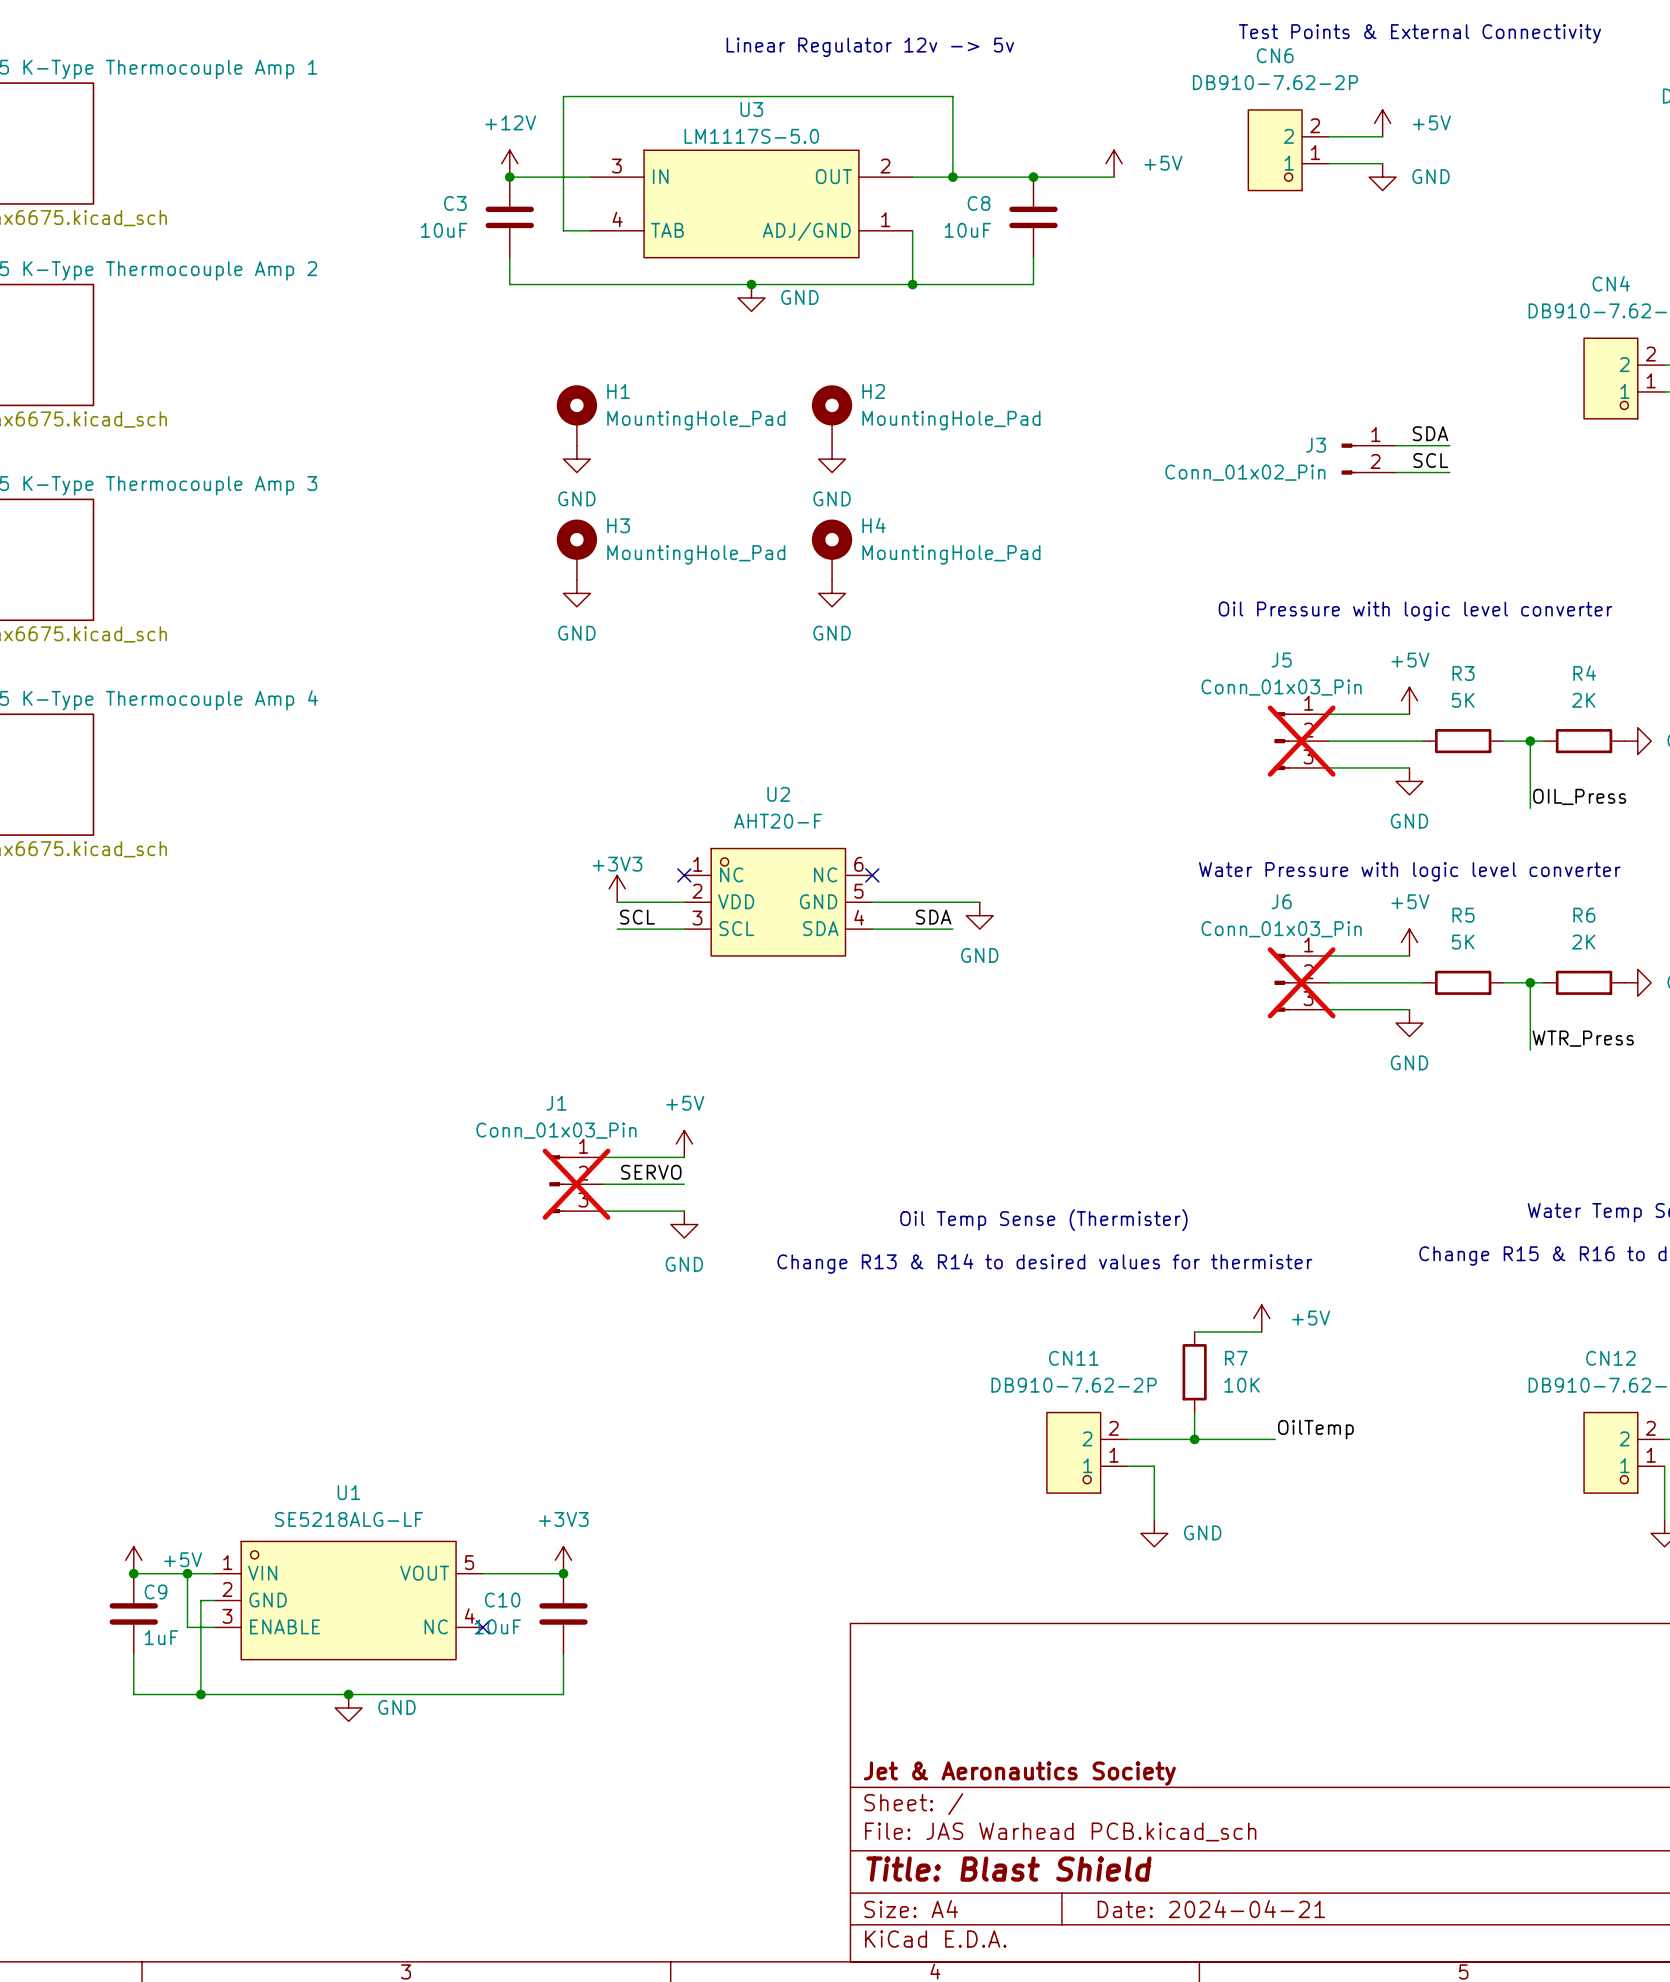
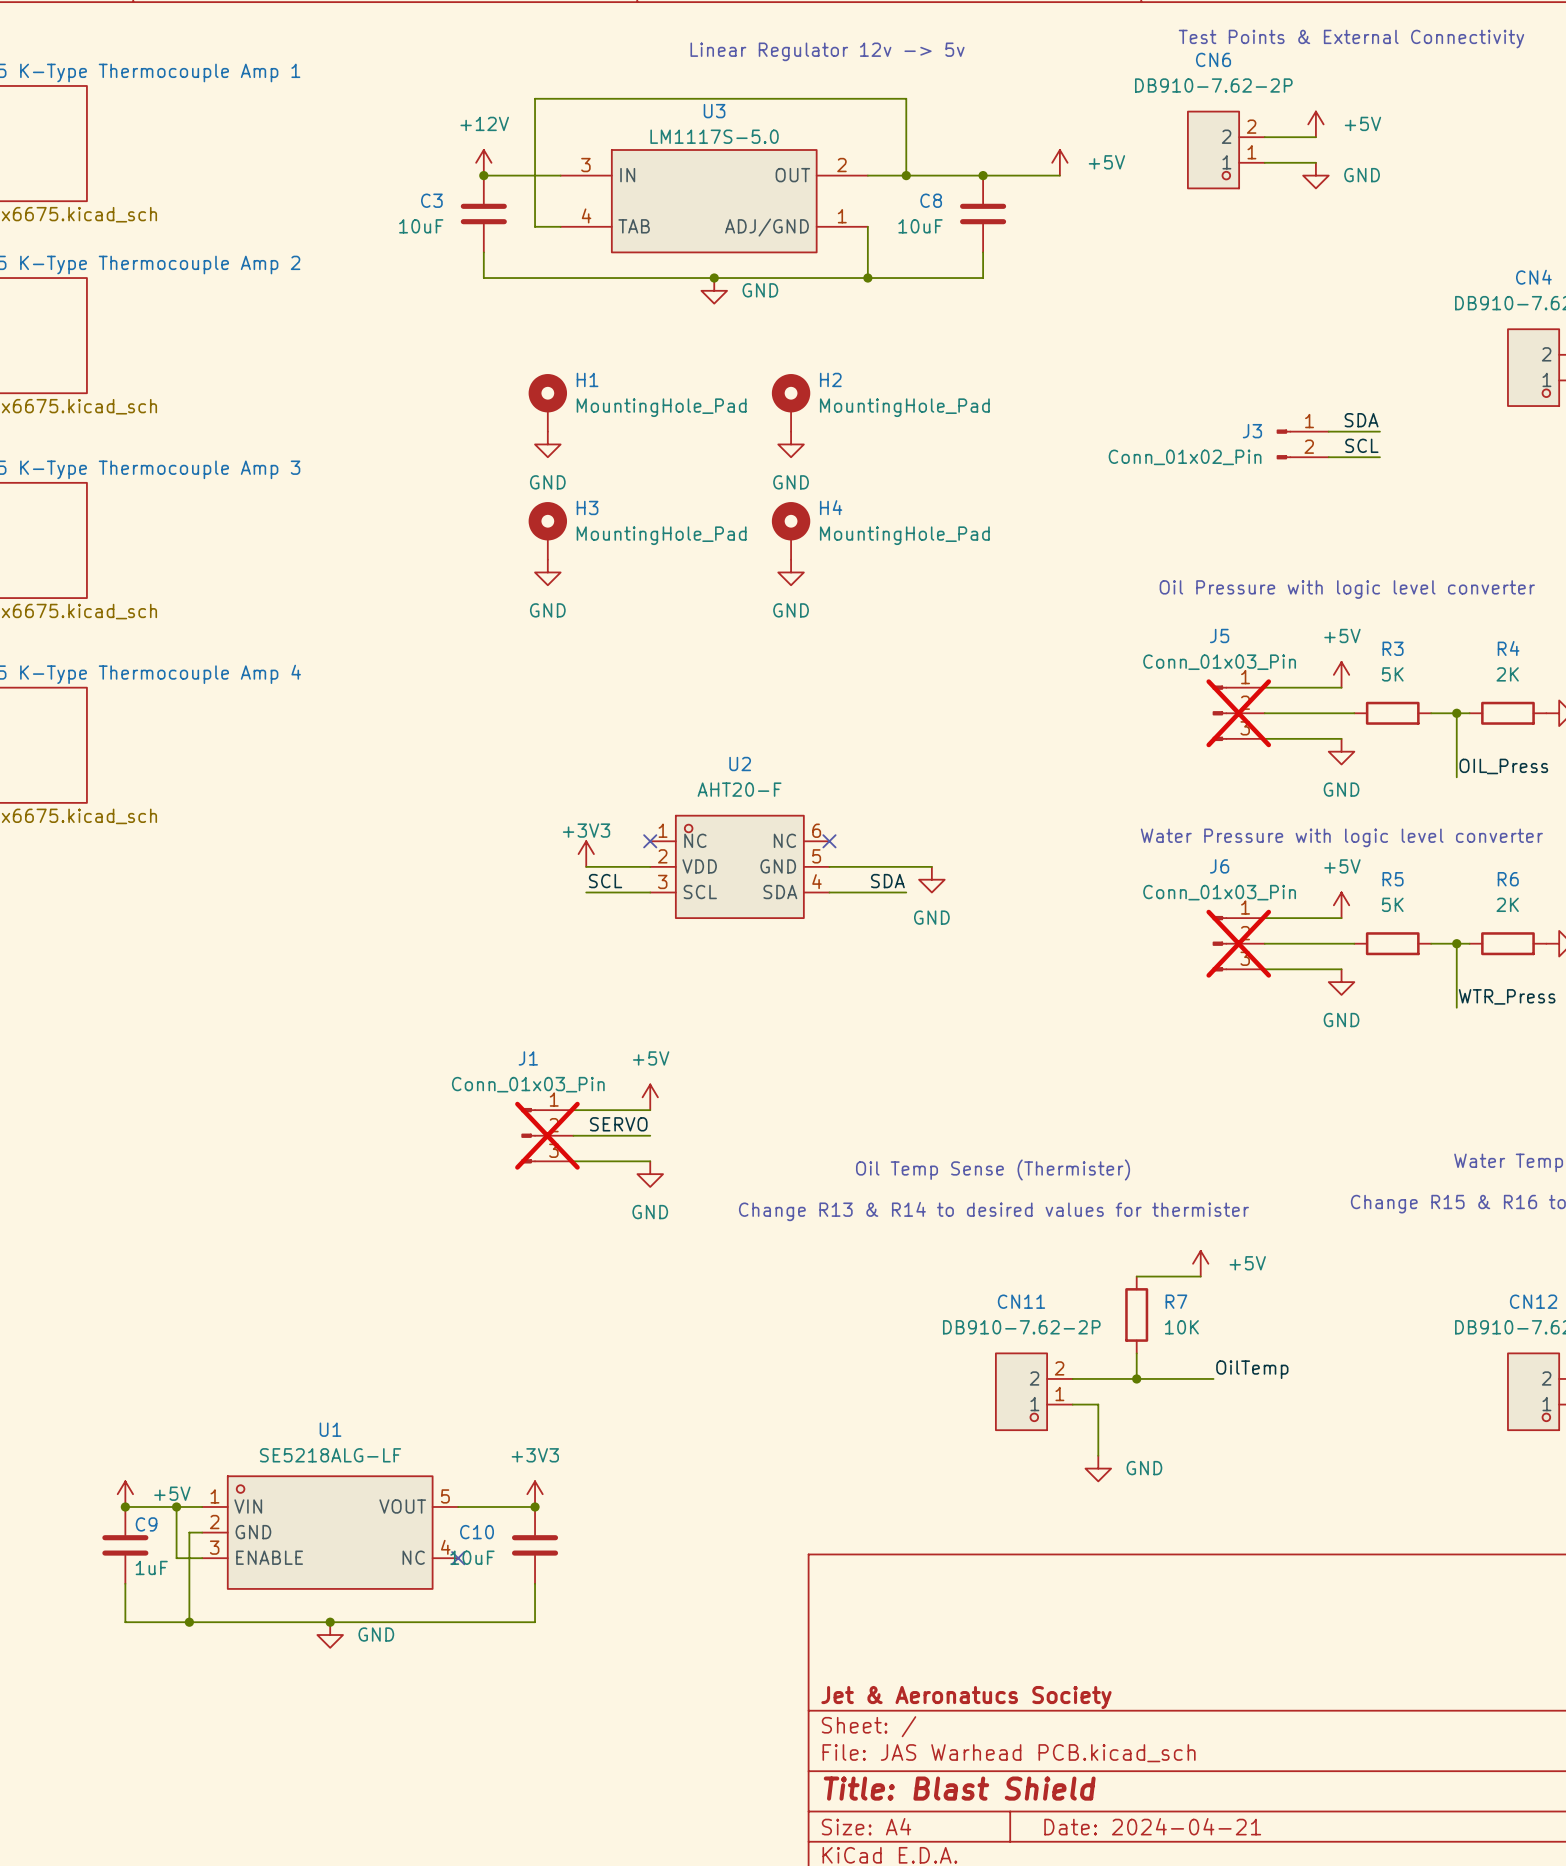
title block: Jet & Aeronautics Society (1019, 1773) -> Jet & Aeronatucs Society (966, 1697)

